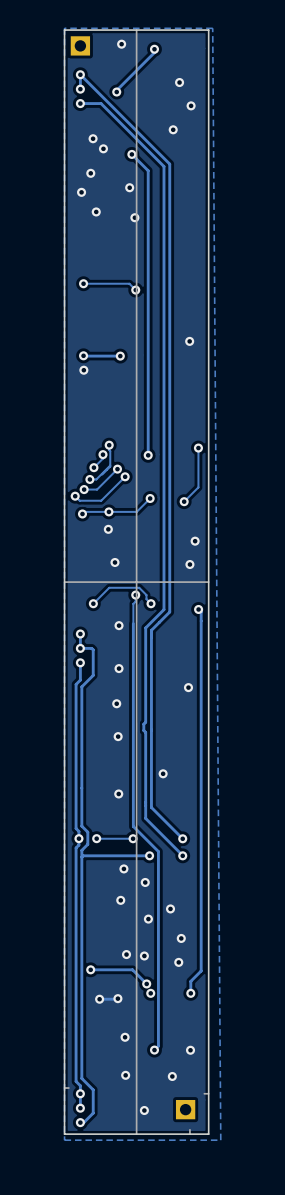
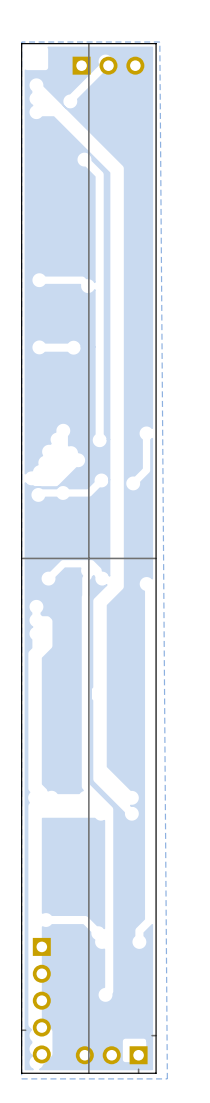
via: (121, 44) -> none
part: (80, 45) -> none
track: (154, 49) (154, 52) (116, 92) -> none
via: (154, 49) -> none
part: none -> (108, 65)
via: (80, 74) -> none
via: (179, 82) -> none
track: (80, 89) (80, 74) (169, 164) (169, 612) (151, 630) (151, 807) (182, 838) -> none
via: (80, 89) -> none
via: (116, 92) -> none
track: (80, 103) (101, 103) (163, 166) (163, 609) (145, 627) (145, 722) (143, 730) (145, 732) (145, 818) (182, 855) -> none
via: (80, 103) -> none
via: (191, 105) -> none
via: (173, 129) -> none
via: (93, 138) -> none
via: (103, 148) -> none
track: (131, 154) (148, 170) (148, 455) -> none
via: (131, 154) -> none
via: (90, 173) -> none
via: (129, 187) -> none
via: (81, 192) -> none
via: (96, 211) -> none
via: (134, 217) -> none
track: (83, 283) (129, 283) (135, 290) -> none
via: (83, 283) -> none
via: (135, 290) -> none
via: (189, 341) -> none
track: (83, 355) (120, 356) -> none
via: (83, 355) -> none
via: (120, 356) -> none
via: (83, 370) -> none
track: (109, 445) (110, 466) (102, 474) -> none
via: (109, 445) -> none
track: (198, 448) (198, 487) (184, 501) -> none
via: (198, 448) -> none
track: (102, 454) (102, 458) (93, 467) -> none
via: (102, 454) -> none
via: (148, 455) -> none
track: (110, 465) (96, 479) (89, 479) -> none
via: (93, 467) -> none
track: (117, 469) (97, 489) (82, 489) -> none
via: (117, 469) -> none
track: (125, 476) (101, 500) (79, 500) (75, 496) -> none
via: (125, 476) -> none
via: (89, 479) -> none
via: (84, 489) -> none
via: (75, 496) -> none
track: (150, 498) (136, 511) (84, 511) (82, 513) -> none
via: (150, 498) -> none
via: (184, 501) -> none
via: (108, 511) -> none
via: (82, 513) -> none
via: (108, 529) -> none
via: (195, 541) -> none
via: (114, 562) -> none
via: (189, 564) -> none
track: (135, 595) (135, 601) (133, 603) (133, 826) (158, 851) (158, 1046) (154, 1050) -> none
via: (135, 595) -> none
via: (93, 603) -> none
track: (151, 603) (146, 599) (146, 595) (139, 587) (109, 587) (93, 603) -> none
via: (151, 603) -> none
track: (198, 609) (201, 612) (201, 970) (190, 981) (190, 993) -> none
via: (198, 609) -> none
via: (119, 625) -> none
track: (80, 633) (80, 648) (93, 649) (93, 675) (81, 686) (81, 826) (87, 832) (87, 844) (81, 850) (81, 1078) (93, 1089) (93, 1113) (83, 1122) (80, 1122) -> none
via: (80, 633) -> none
via: (80, 648) -> none
track: (80, 662) (80, 680) (76, 684) (76, 828) (78, 831) (78, 845) (76, 847) (76, 1081) (80, 1085) (80, 1108) -> none
via: (80, 662) -> none
via: (119, 668) -> none
via: (188, 687) -> none
via: (116, 703) -> none
via: (118, 736) -> none
via: (163, 773) -> none
via: (118, 793) -> none
via: (78, 838) -> none
via: (96, 838) -> none
track: (133, 838) (96, 838) -> none
via: (133, 838) -> none
via: (182, 838) -> none
track: (149, 855) (81, 857) -> none
via: (149, 855) -> none
via: (182, 855) -> none
via: (123, 868) -> none
via: (145, 882) -> none
via: (120, 900) -> none
via: (170, 908) -> none
via: (148, 919) -> none
via: (181, 938) -> none
via: (126, 954) -> none
via: (144, 955) -> none
via: (178, 962) -> none
track: (90, 969) (132, 969) (146, 983) -> none
via: (90, 969) -> none
via: (146, 983) -> none
via: (150, 993) -> none
via: (190, 993) -> none
track: (117, 998) (99, 999) -> none
via: (117, 998) -> none
via: (99, 999) -> none
via: (125, 1037) -> none
via: (154, 1050) -> none
via: (190, 1050) -> none
part: none -> (41, 1000)
via: (125, 1075) -> none
via: (172, 1076) -> none
via: (80, 1093) -> none
via: (80, 1108) -> none
part: (185, 1109) -> none
via: (144, 1110) -> none
part: none -> (111, 1055)
via: (80, 1122) -> none

